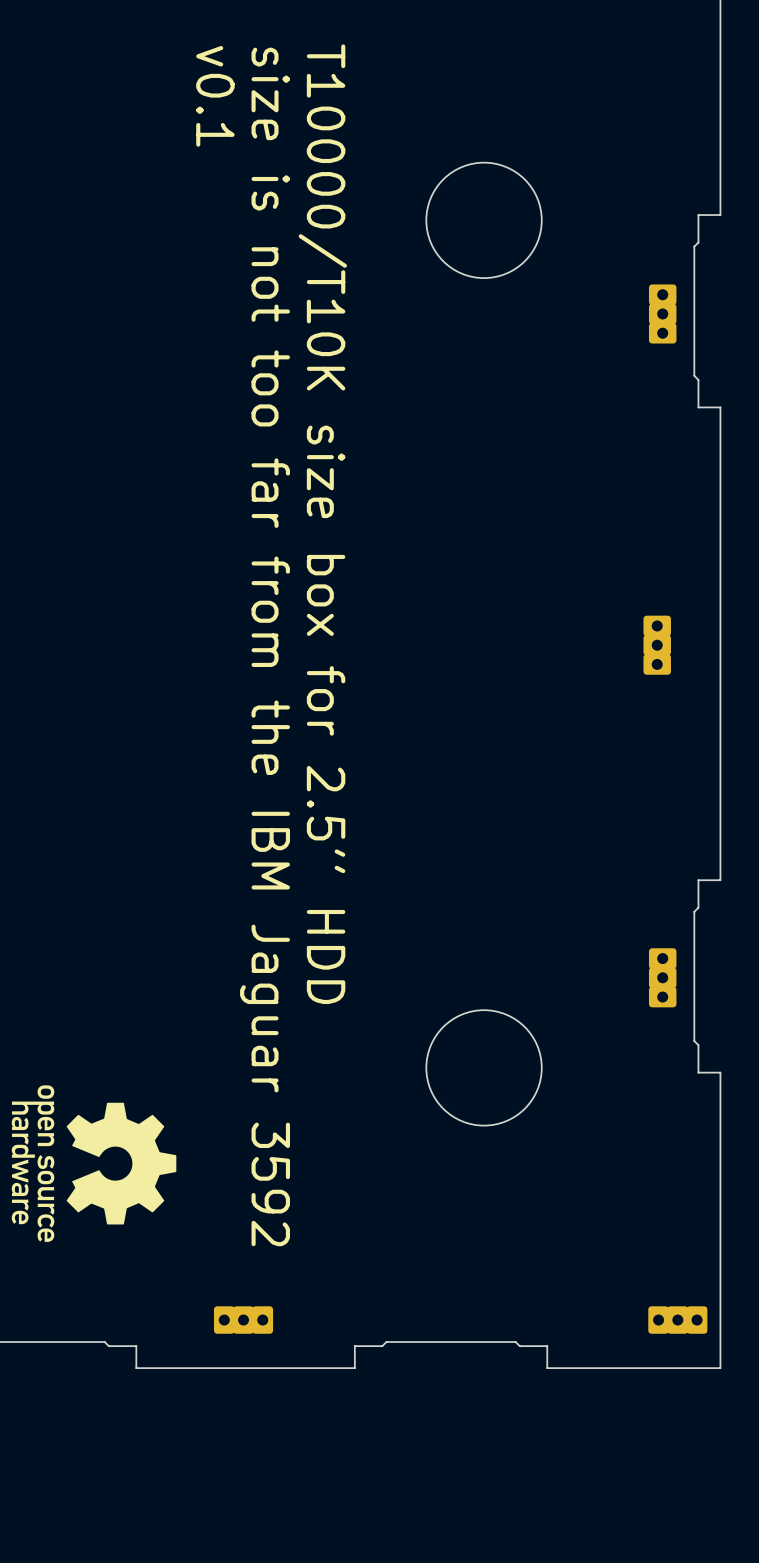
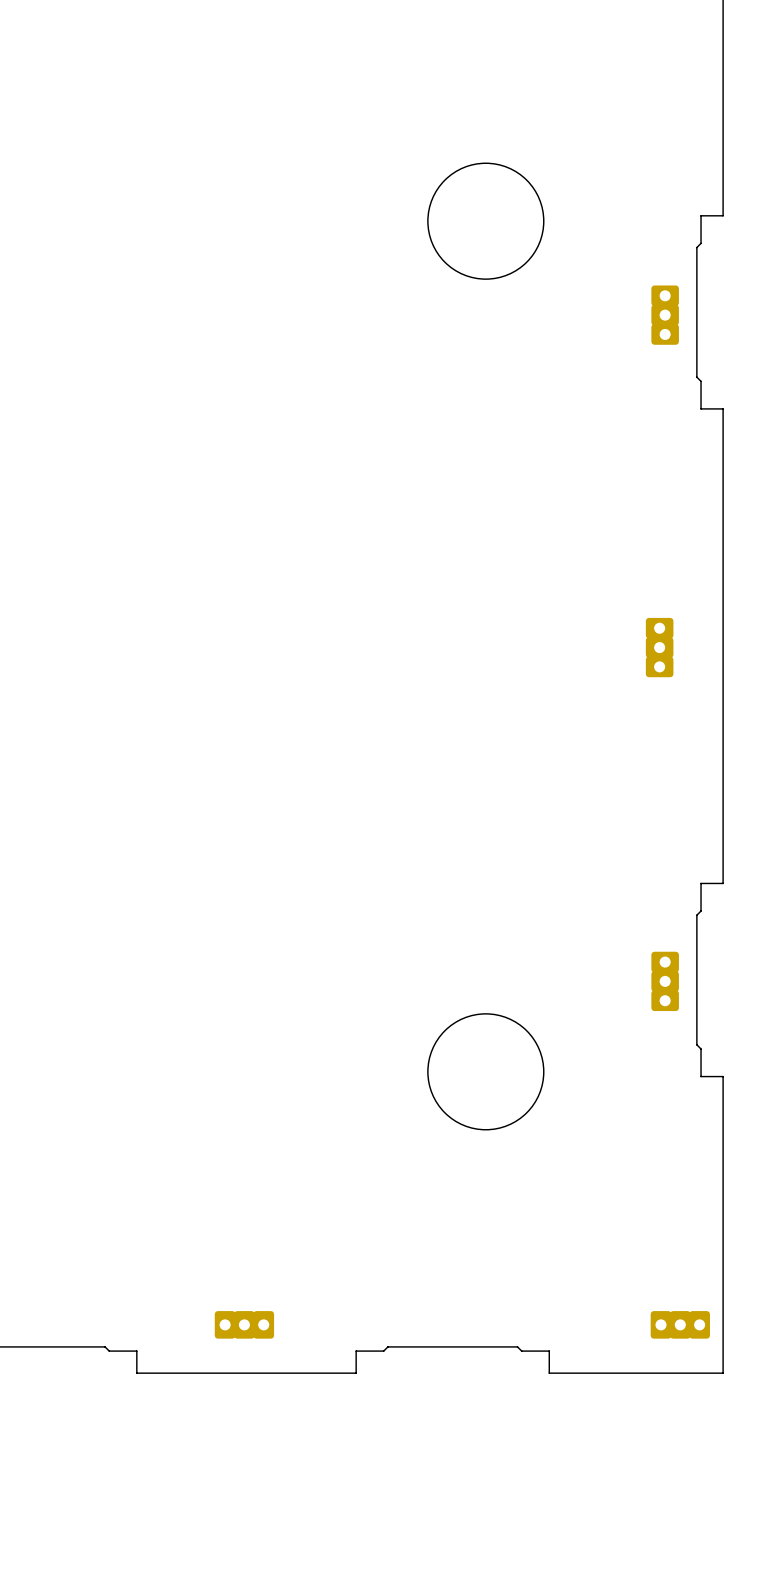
text: v0.1 (215, 96) -> none
text: T10000/T10K size box for 2.5'' HDD (322, 524) -> none
text: size is not too far from the IBM Jaguar 3592 (265, 646) -> none
drawing: [11, 1085, 177, 1242] -> none

